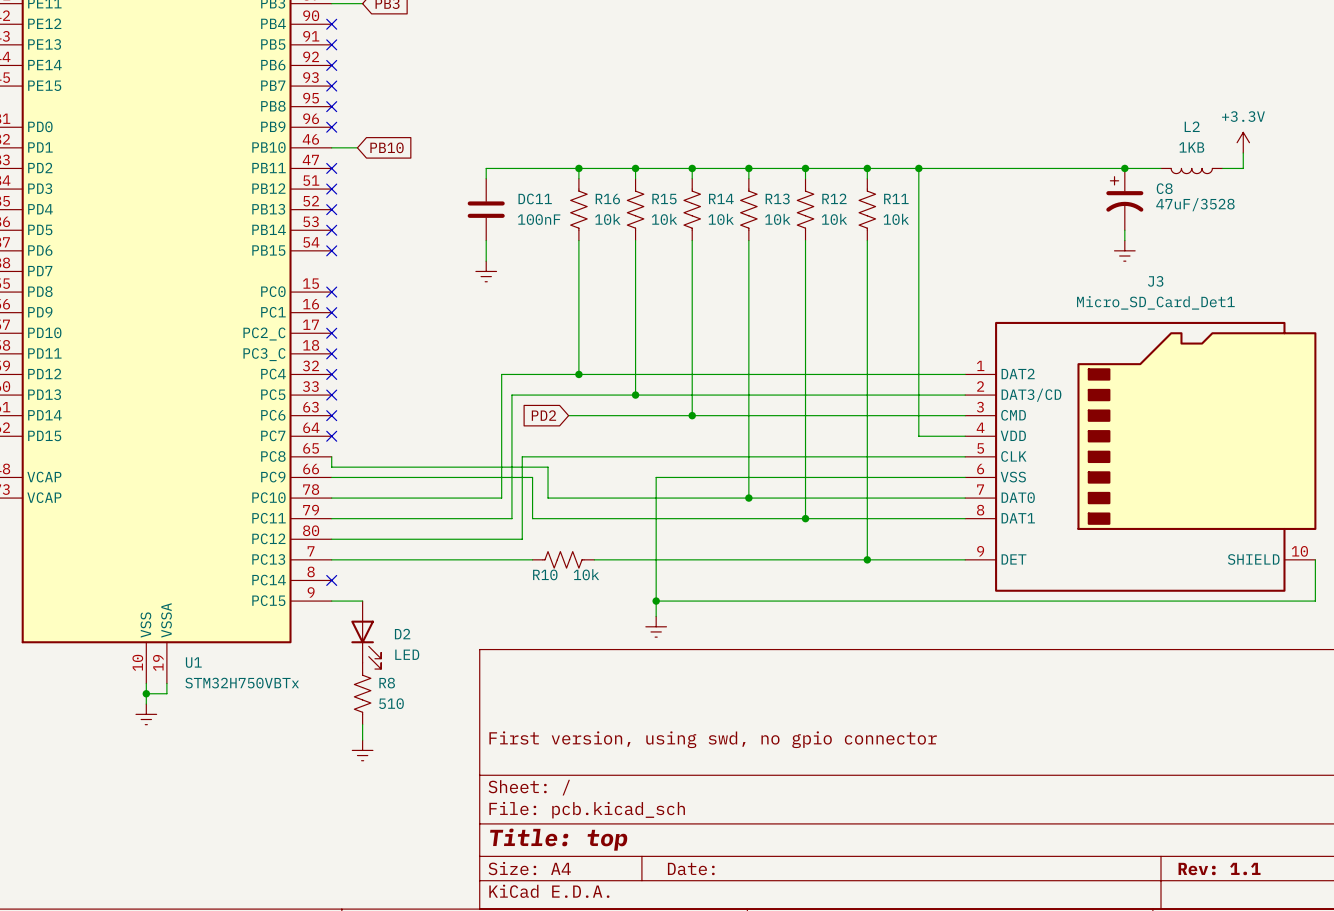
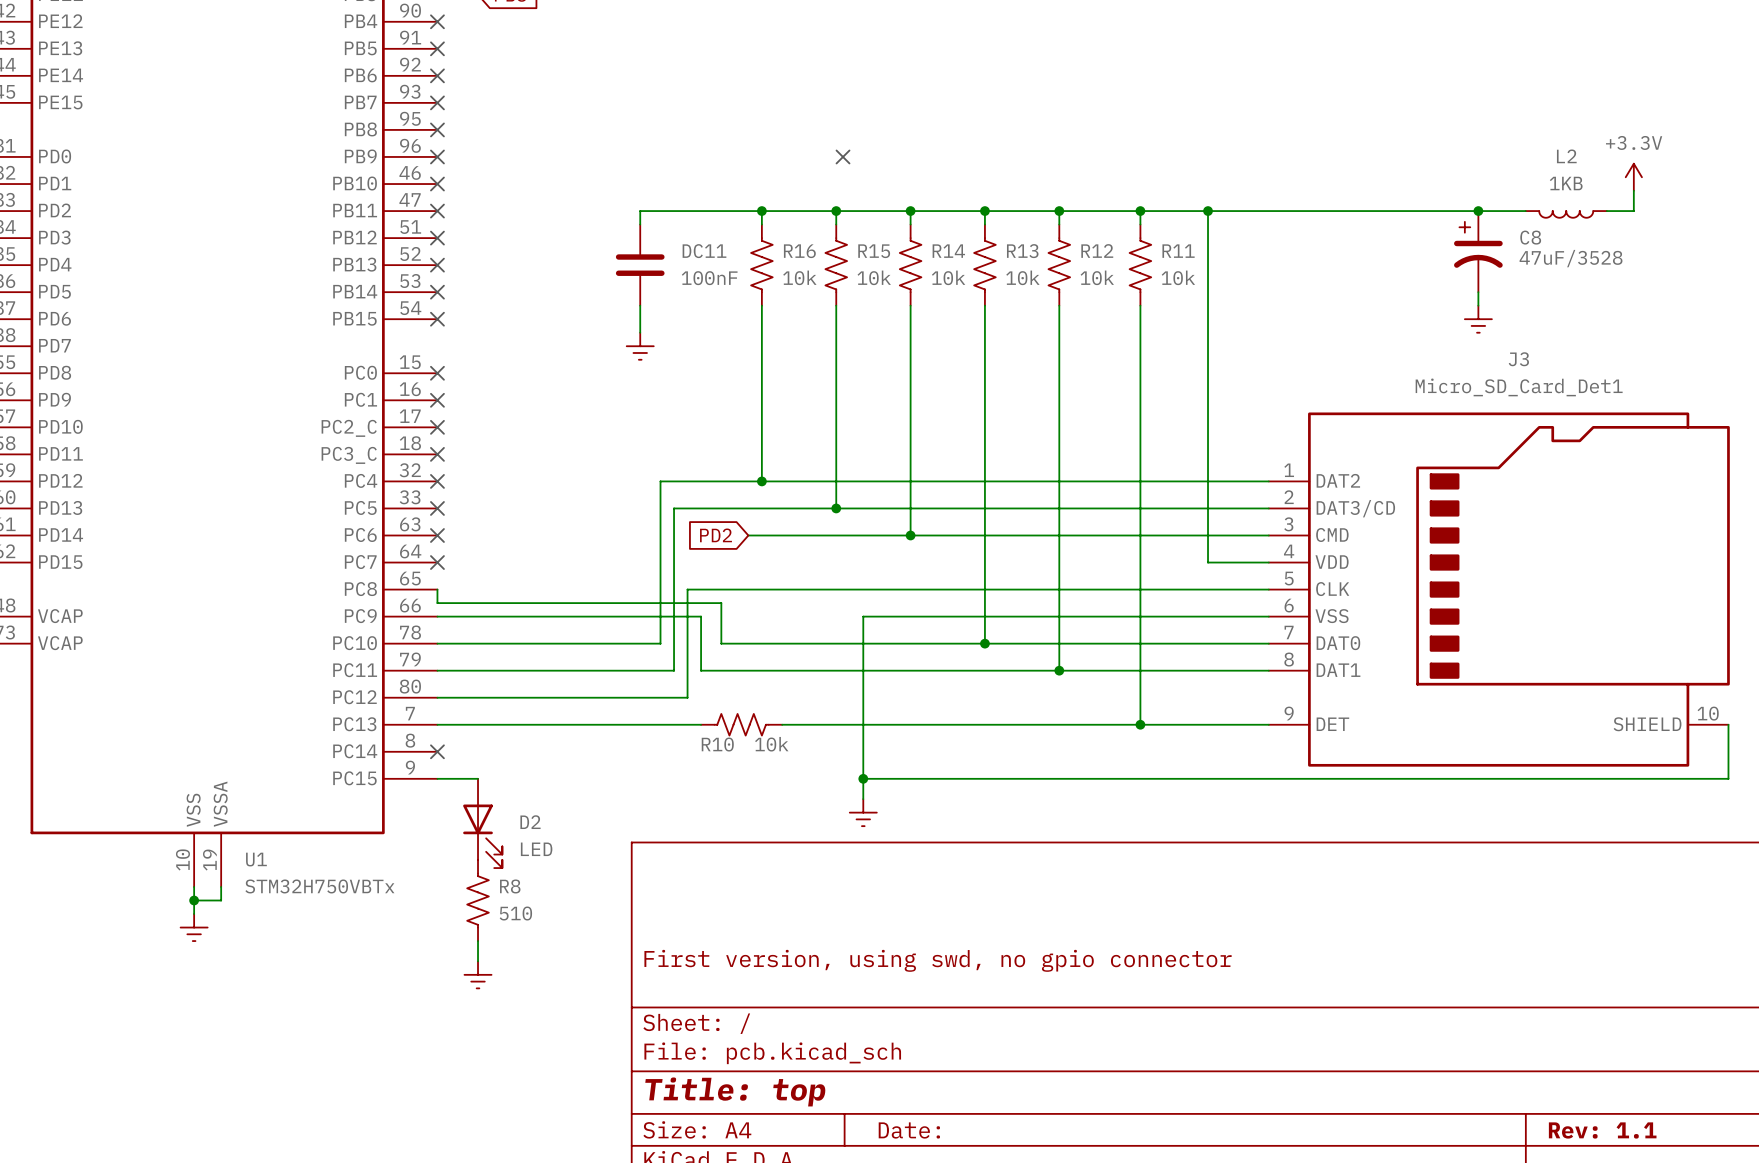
no-connect mark: none -> (843, 156)
wire: (331, 147) (357, 147) -> none
no-connect mark: none -> (437, 184)
global label: PB10 (387, 147) -> none

